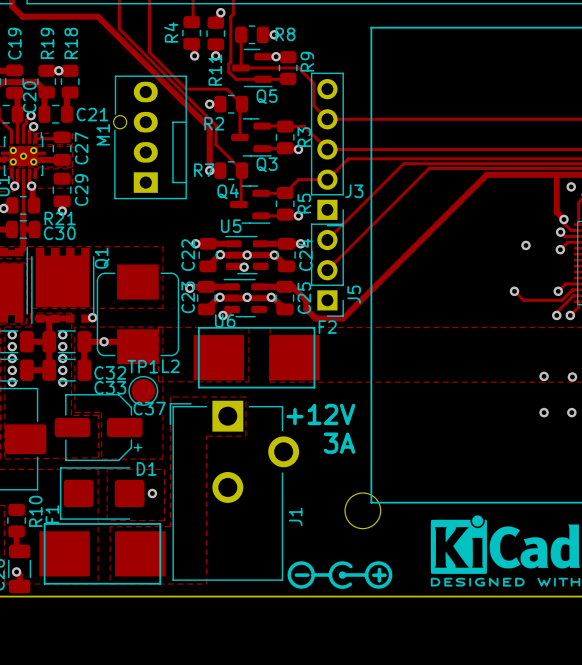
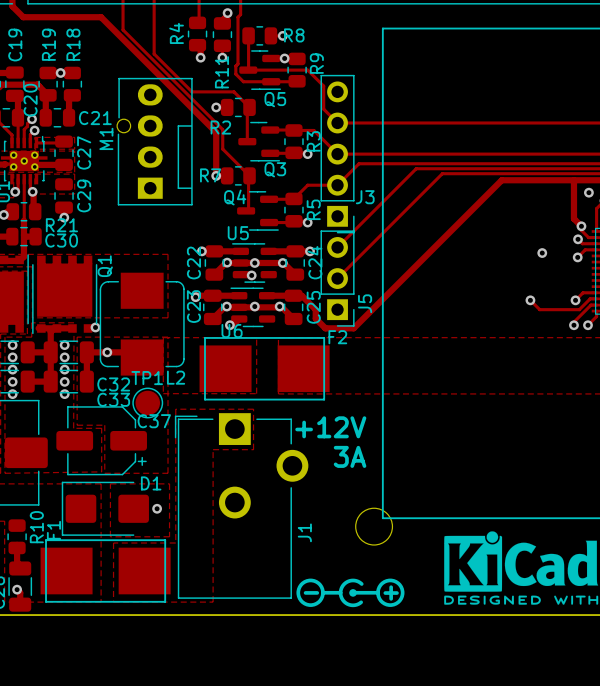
via: (544, 376) -> none
via: (572, 377) -> none
via: (544, 412) -> none
via: (571, 412) -> none

